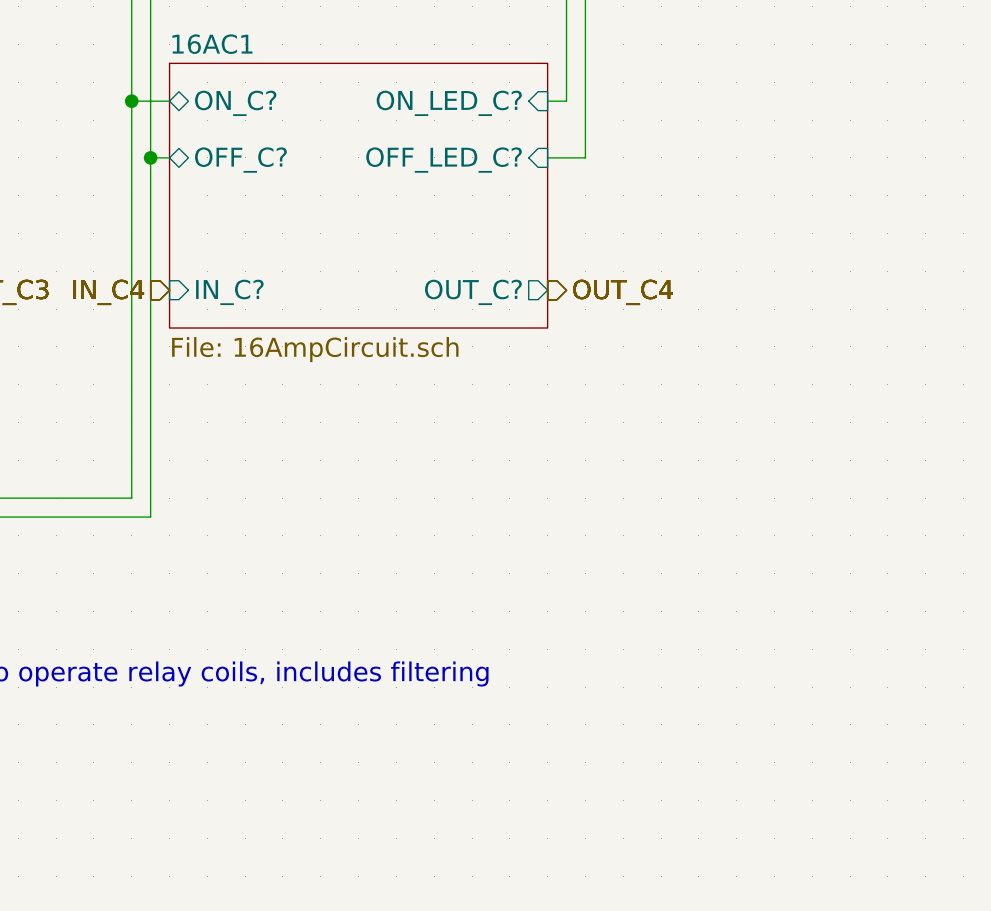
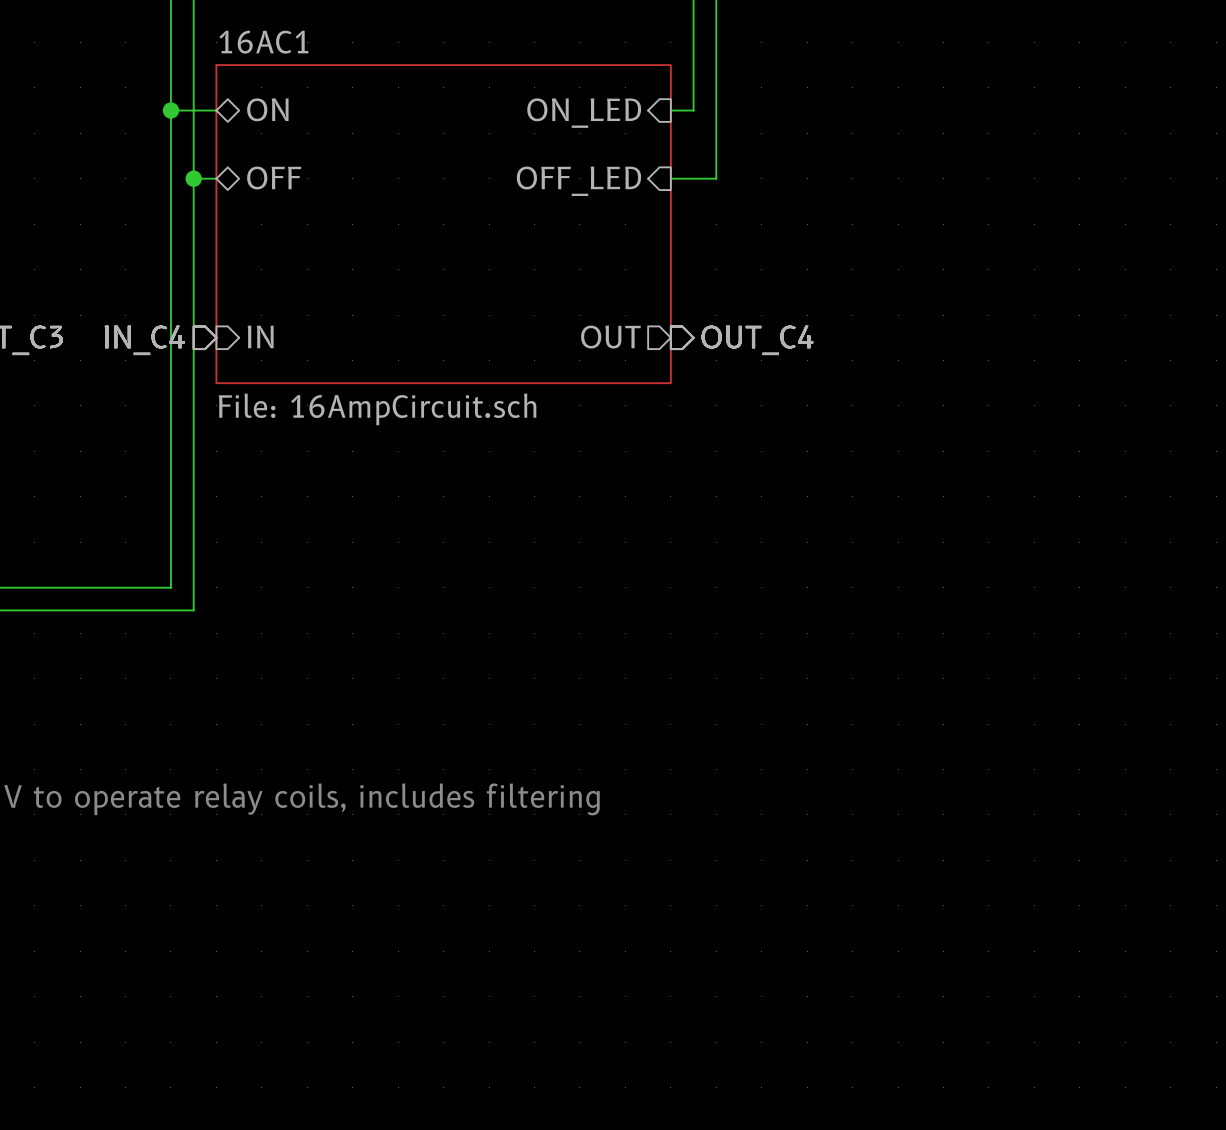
sheet pin: ON_C? (235, 103) -> ON (267, 109)
sheet pin: ON_LED_C? (449, 103) -> ON_LED (584, 113)
sheet pin: OFF_C? (240, 160) -> OFF (274, 178)
sheet pin: OFF_LED_C? (444, 160) -> OFF_LED (578, 181)
sheet pin: IN_C? (229, 292) -> IN (260, 336)
sheet pin: OUT_C? (473, 292) -> OUT (610, 337)

